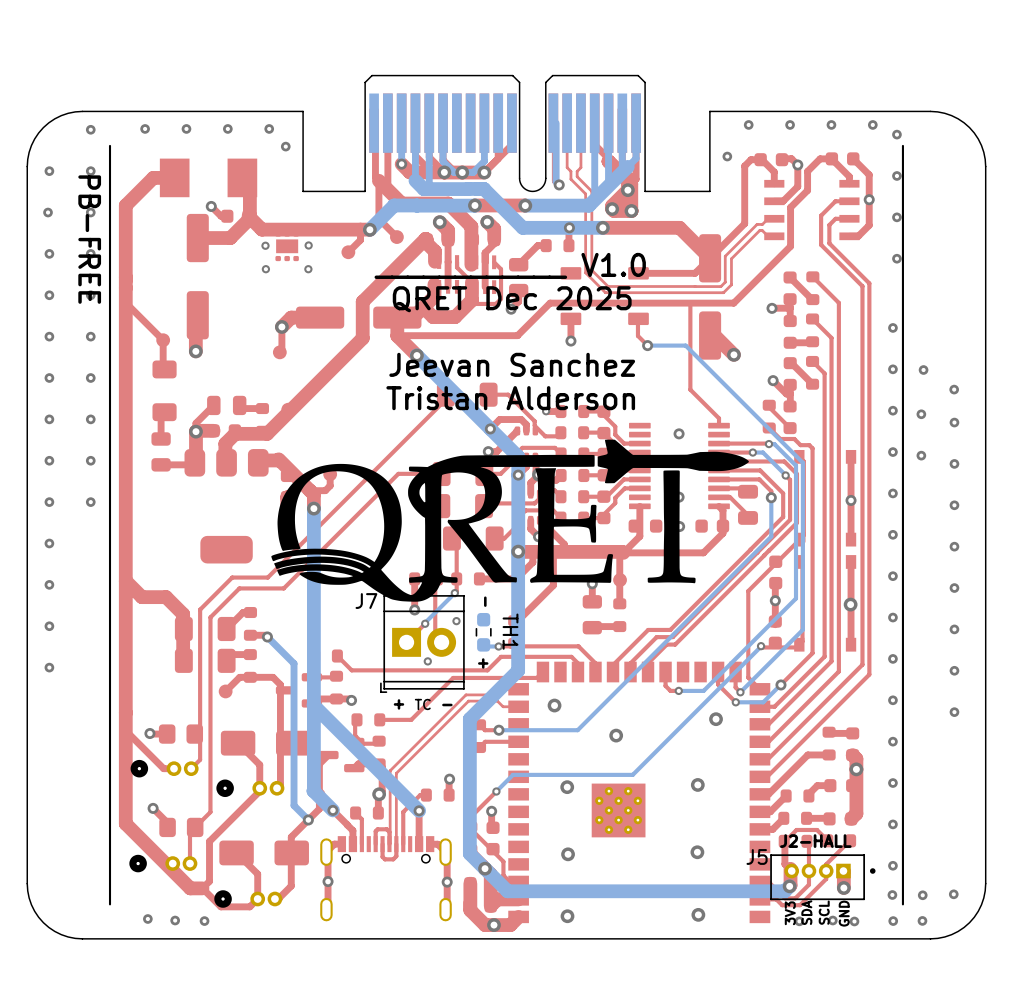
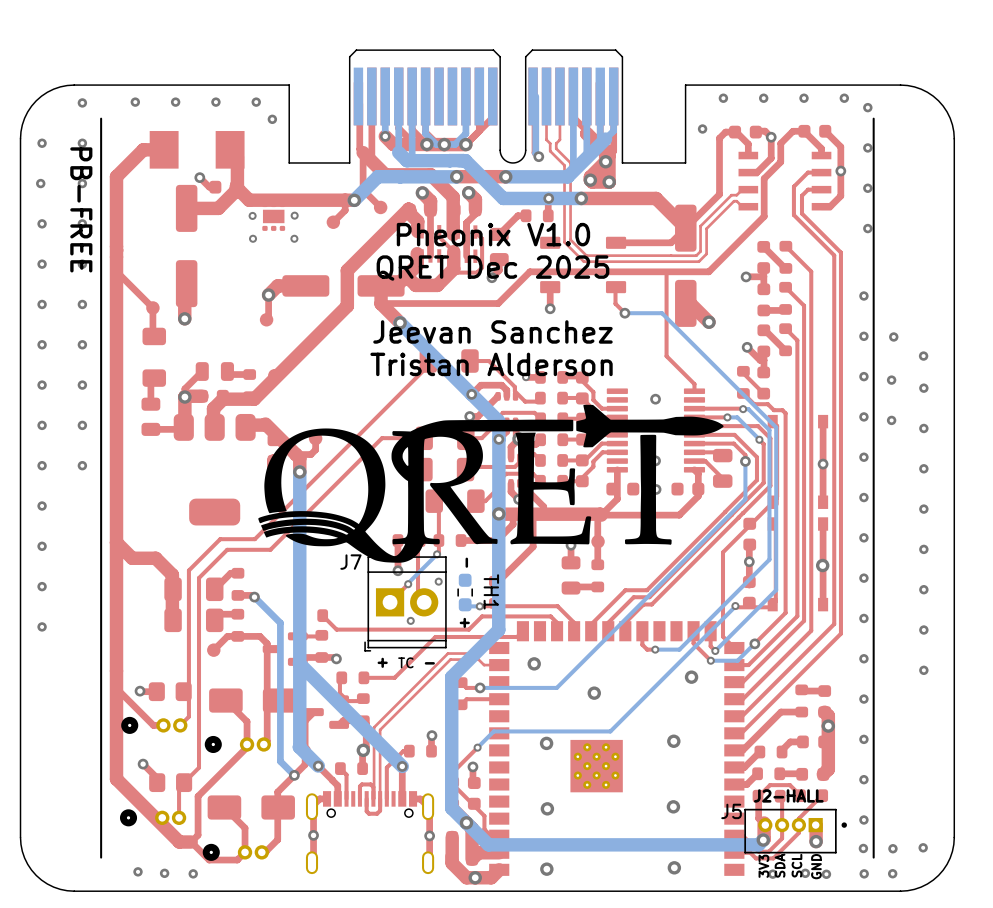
text: ____________ V1.0 (510, 265) -> Pheonix V1.0 (493, 234)

